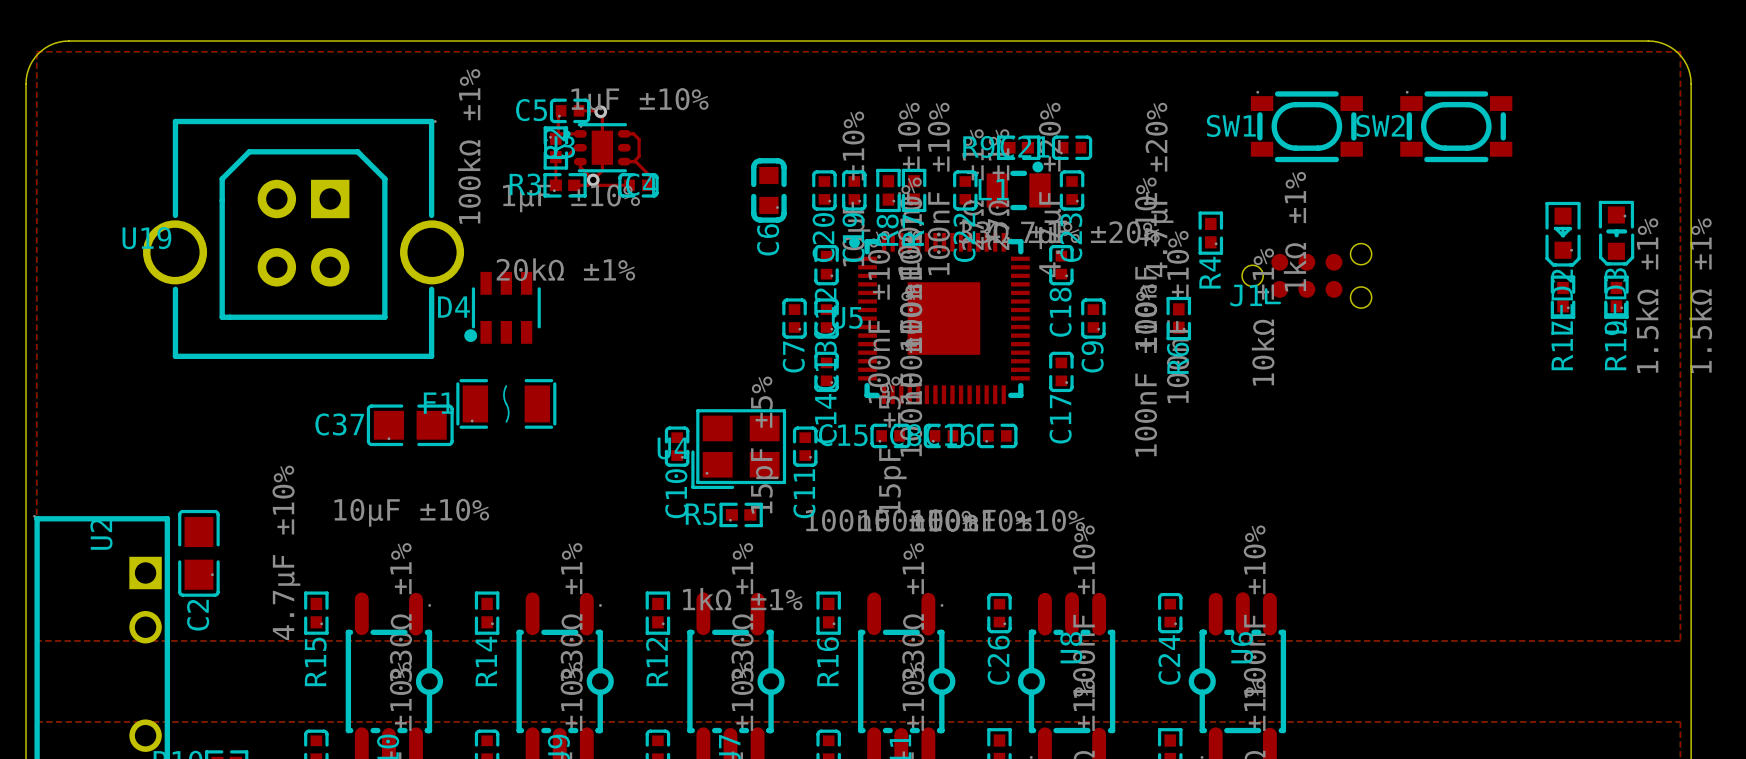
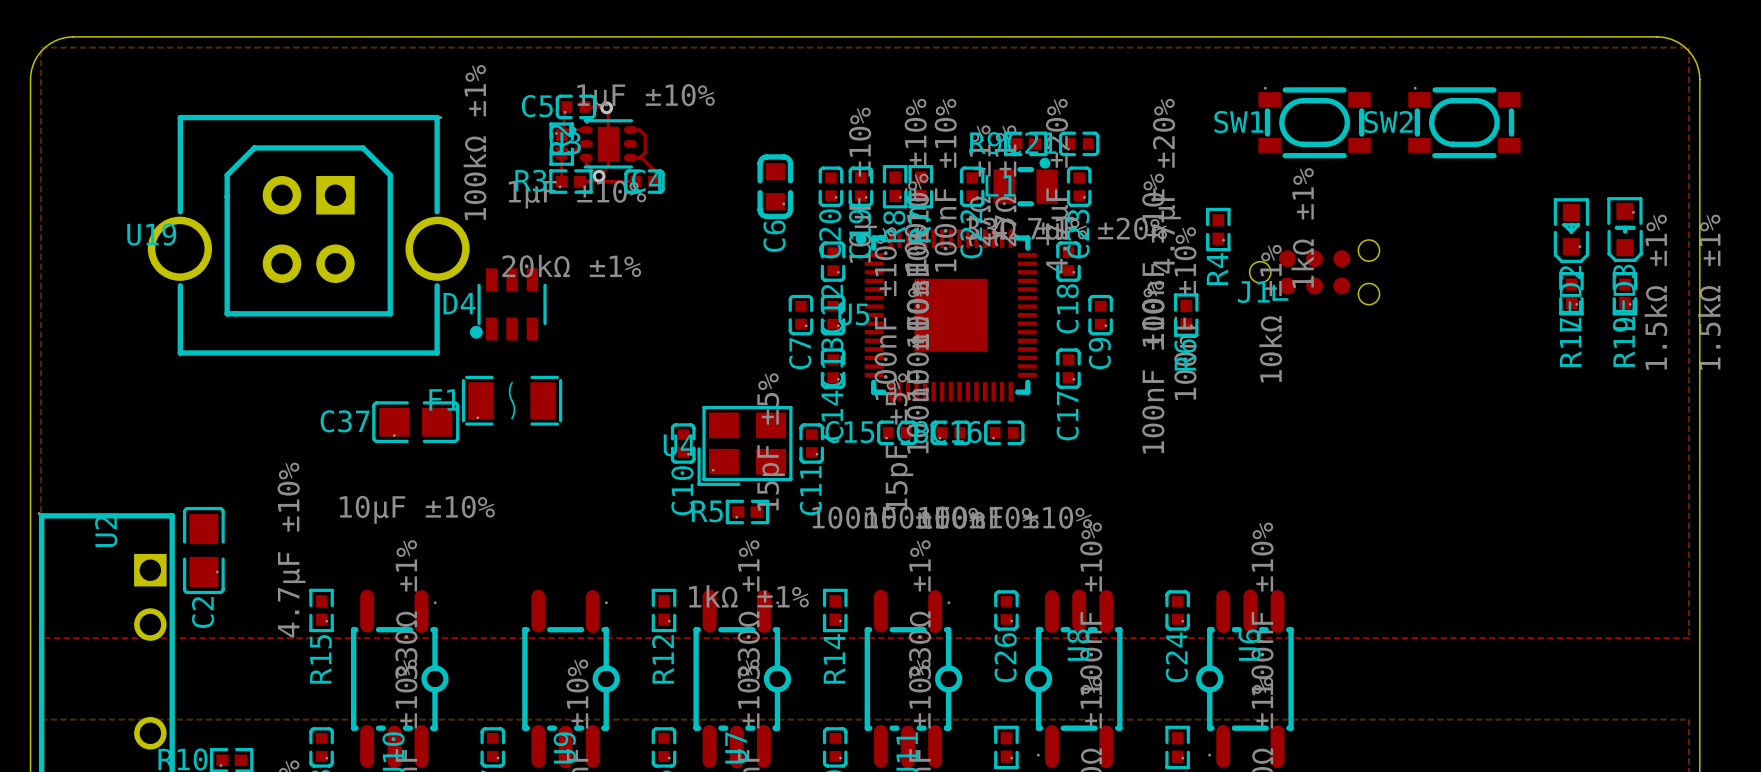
R14: 330Ω ±1% (487, 613) -> none
R16 name: R16 (827, 661) -> R14 (834, 658)

